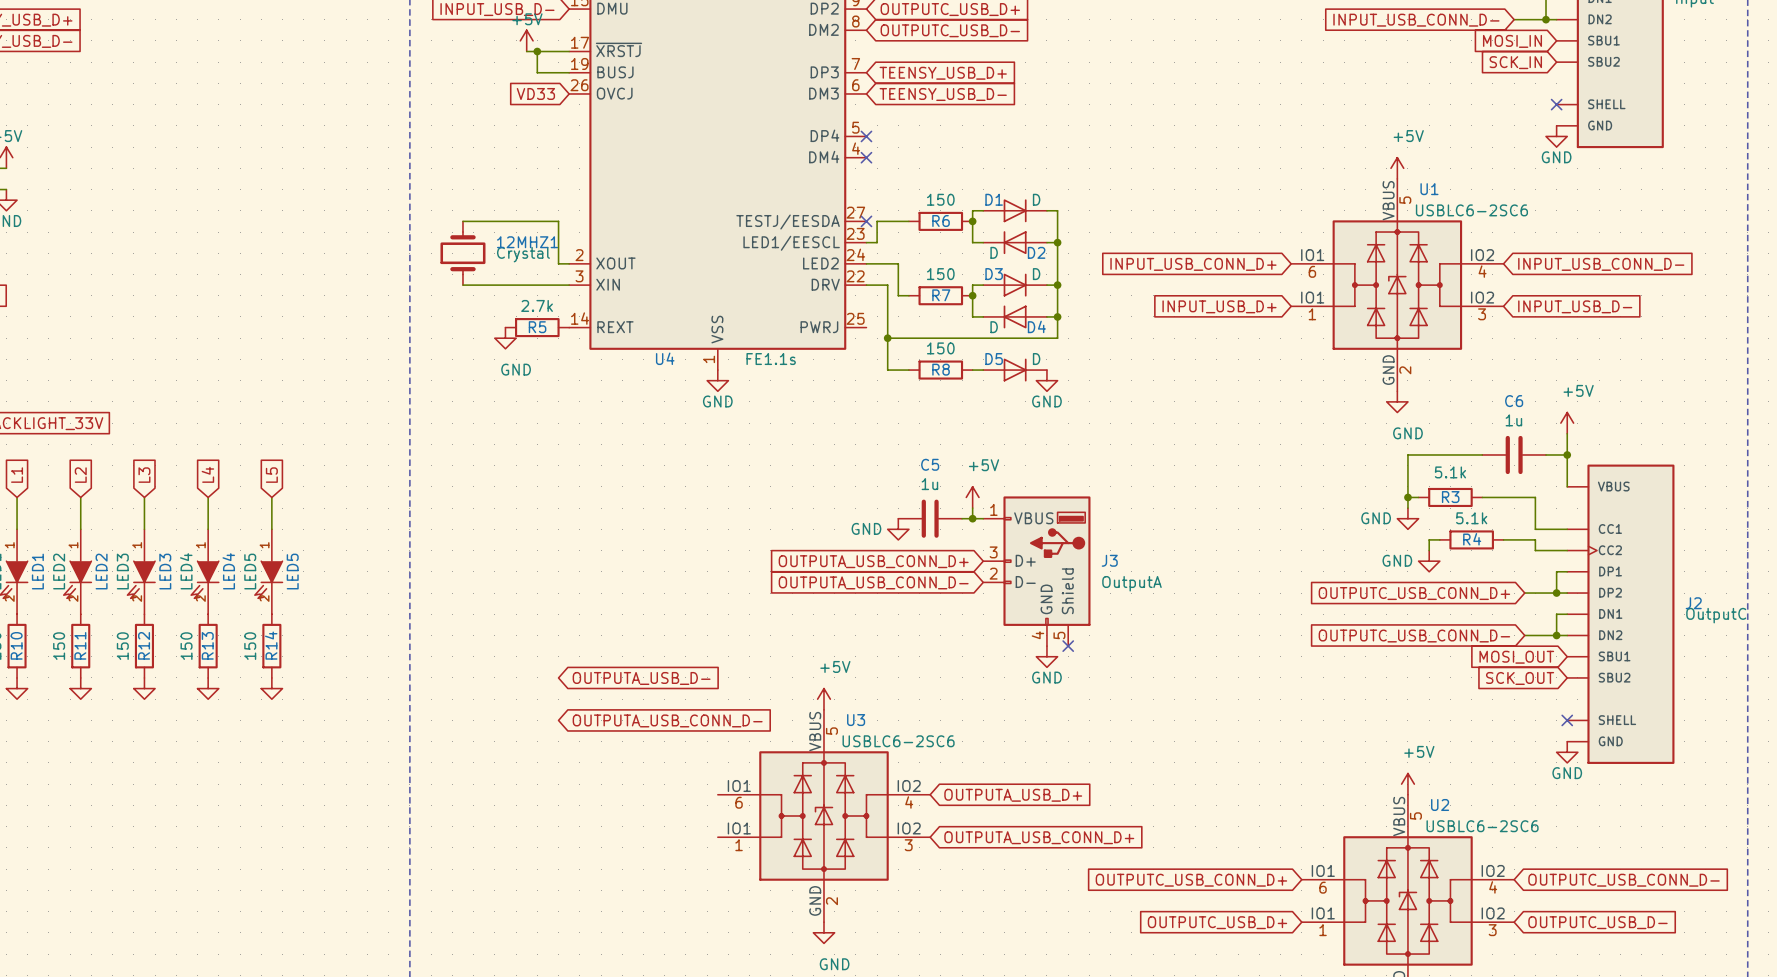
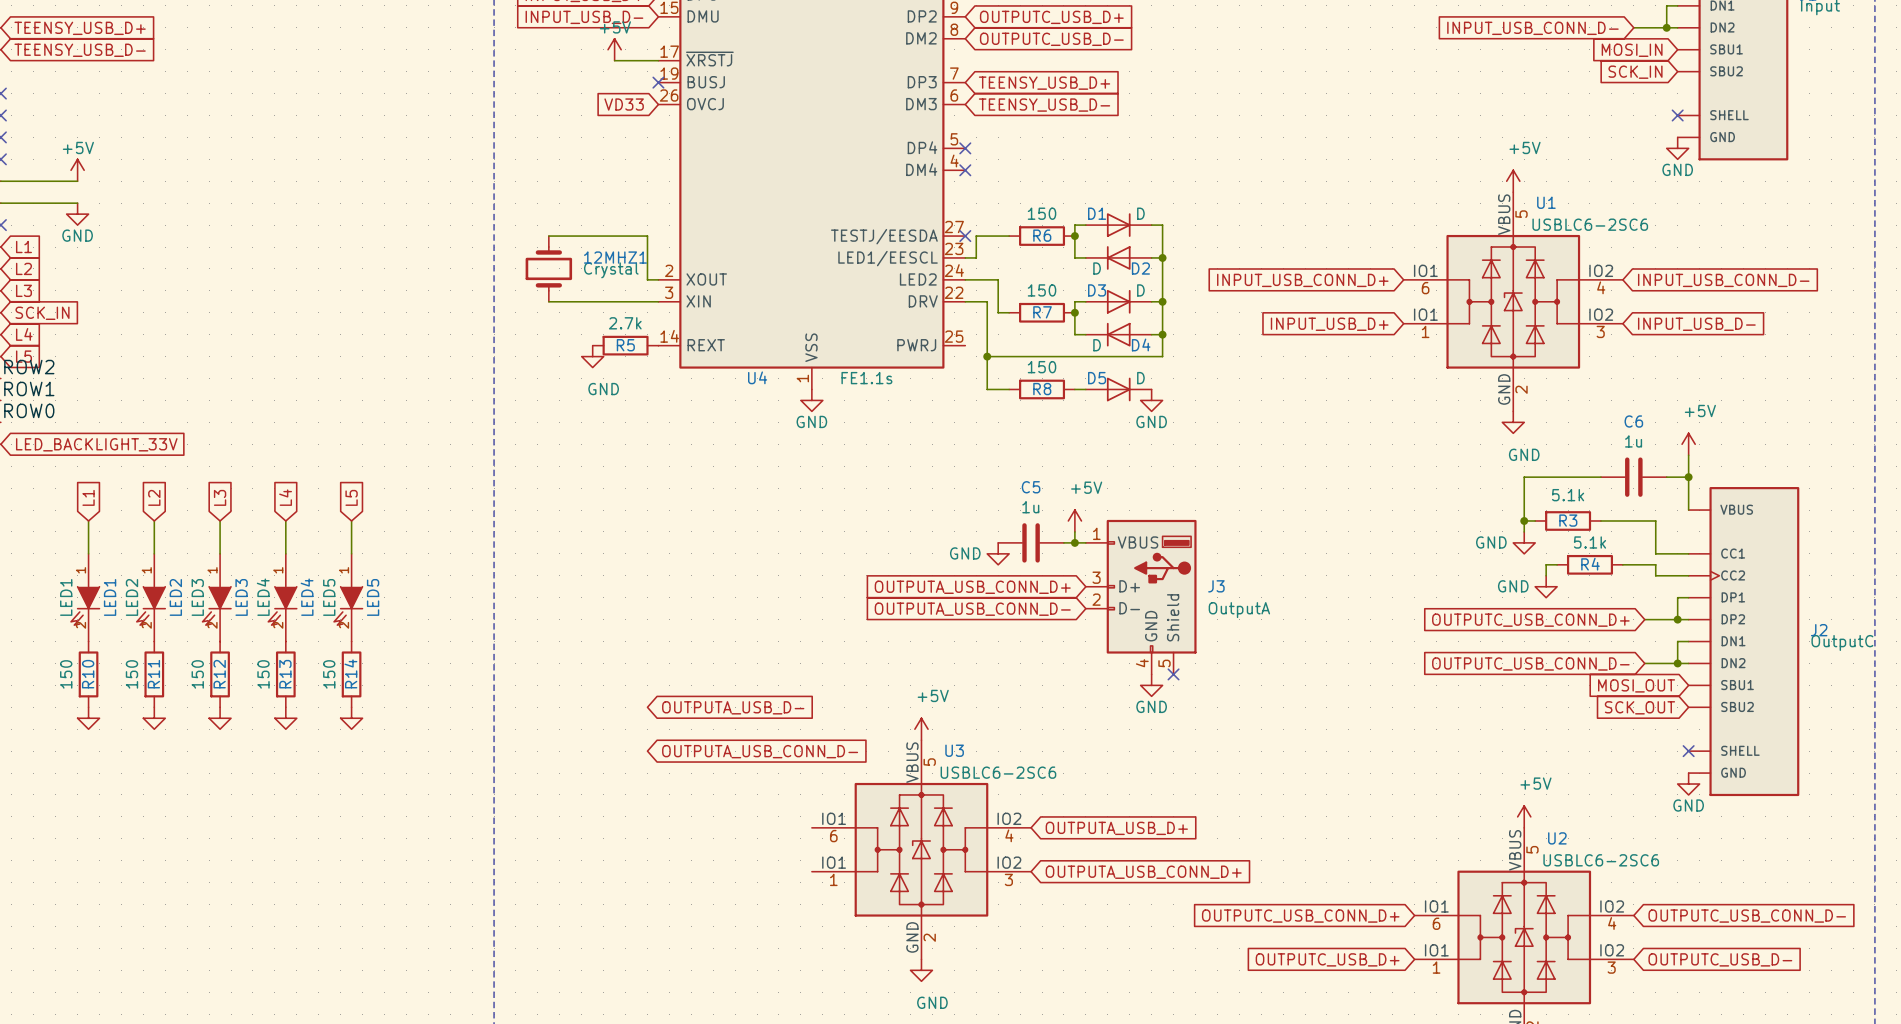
wire: (537, 51) (537, 72) (569, 72) -> none
junction: (537, 51) -> none
no-connect mark: none -> (658, 82)

